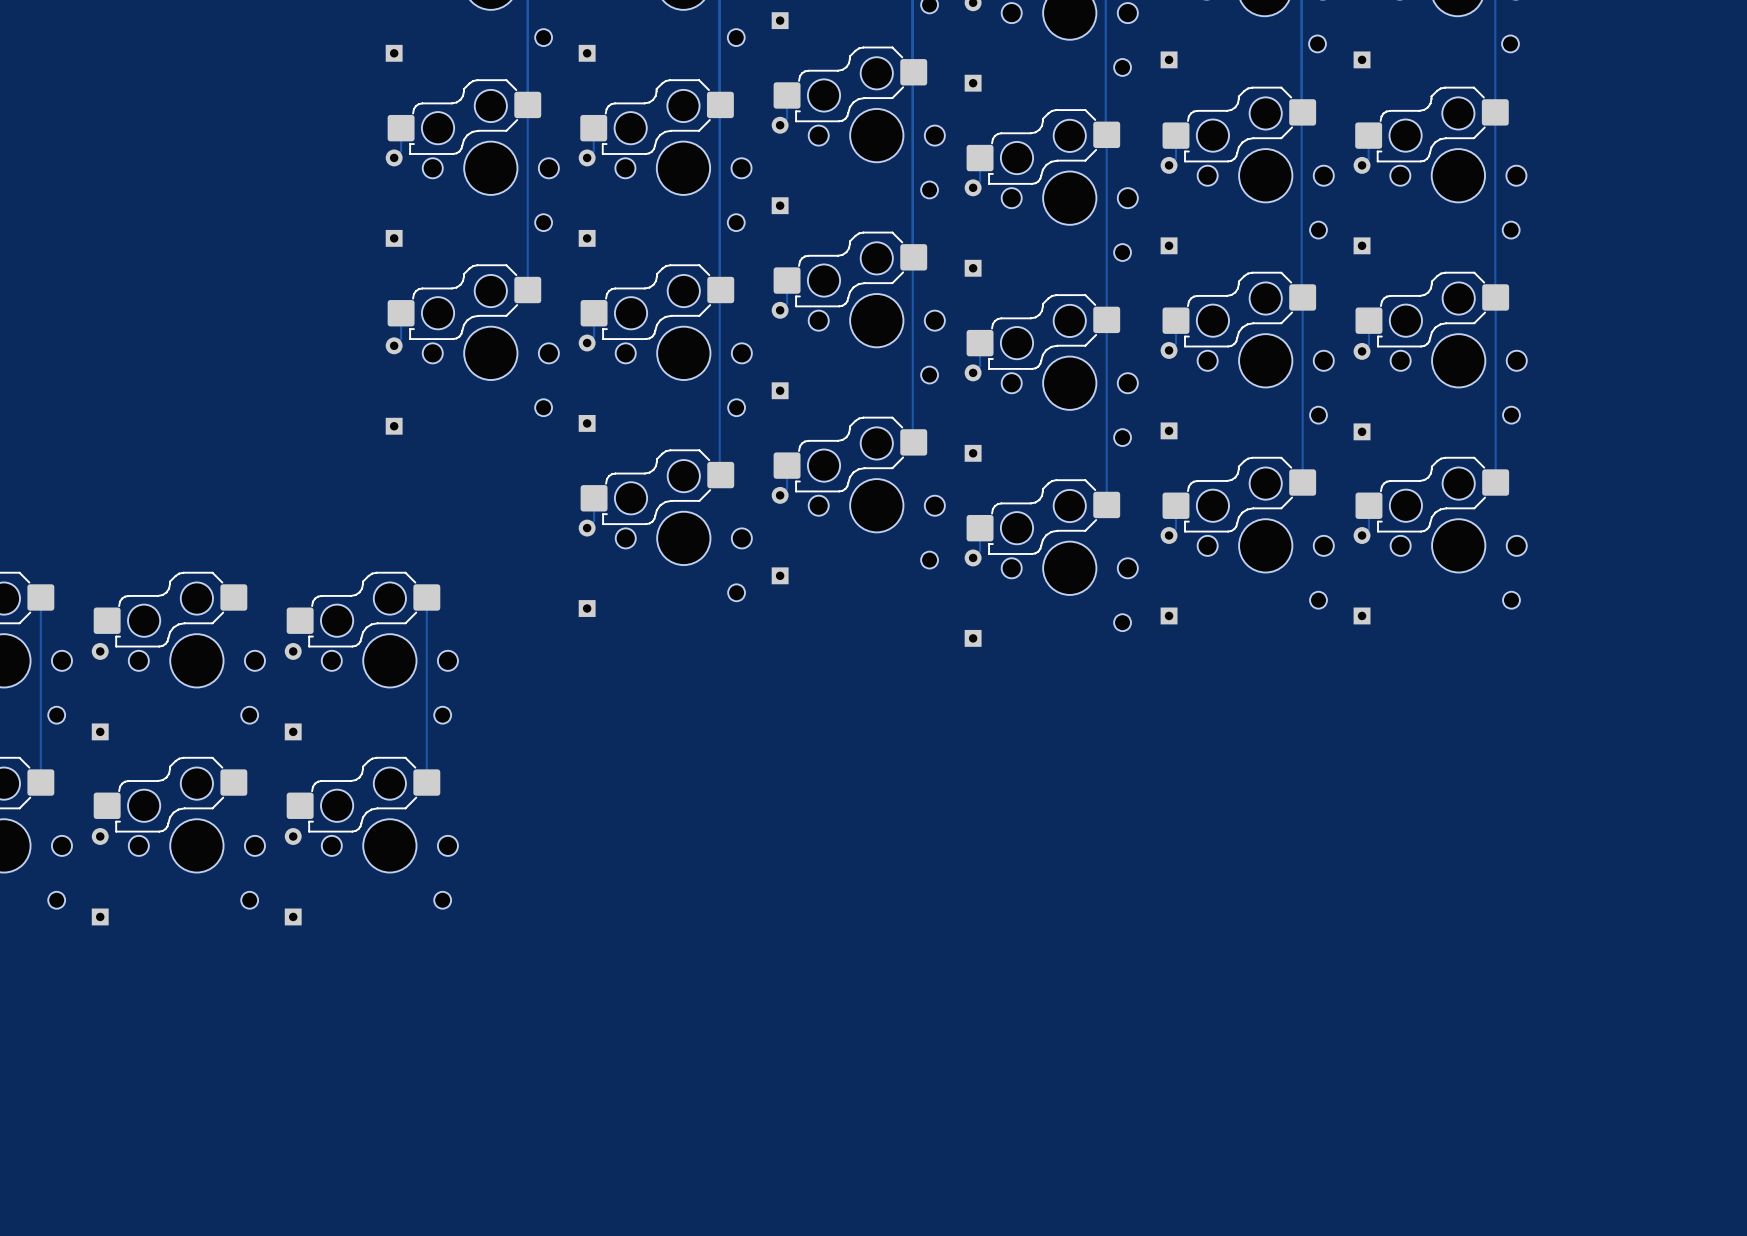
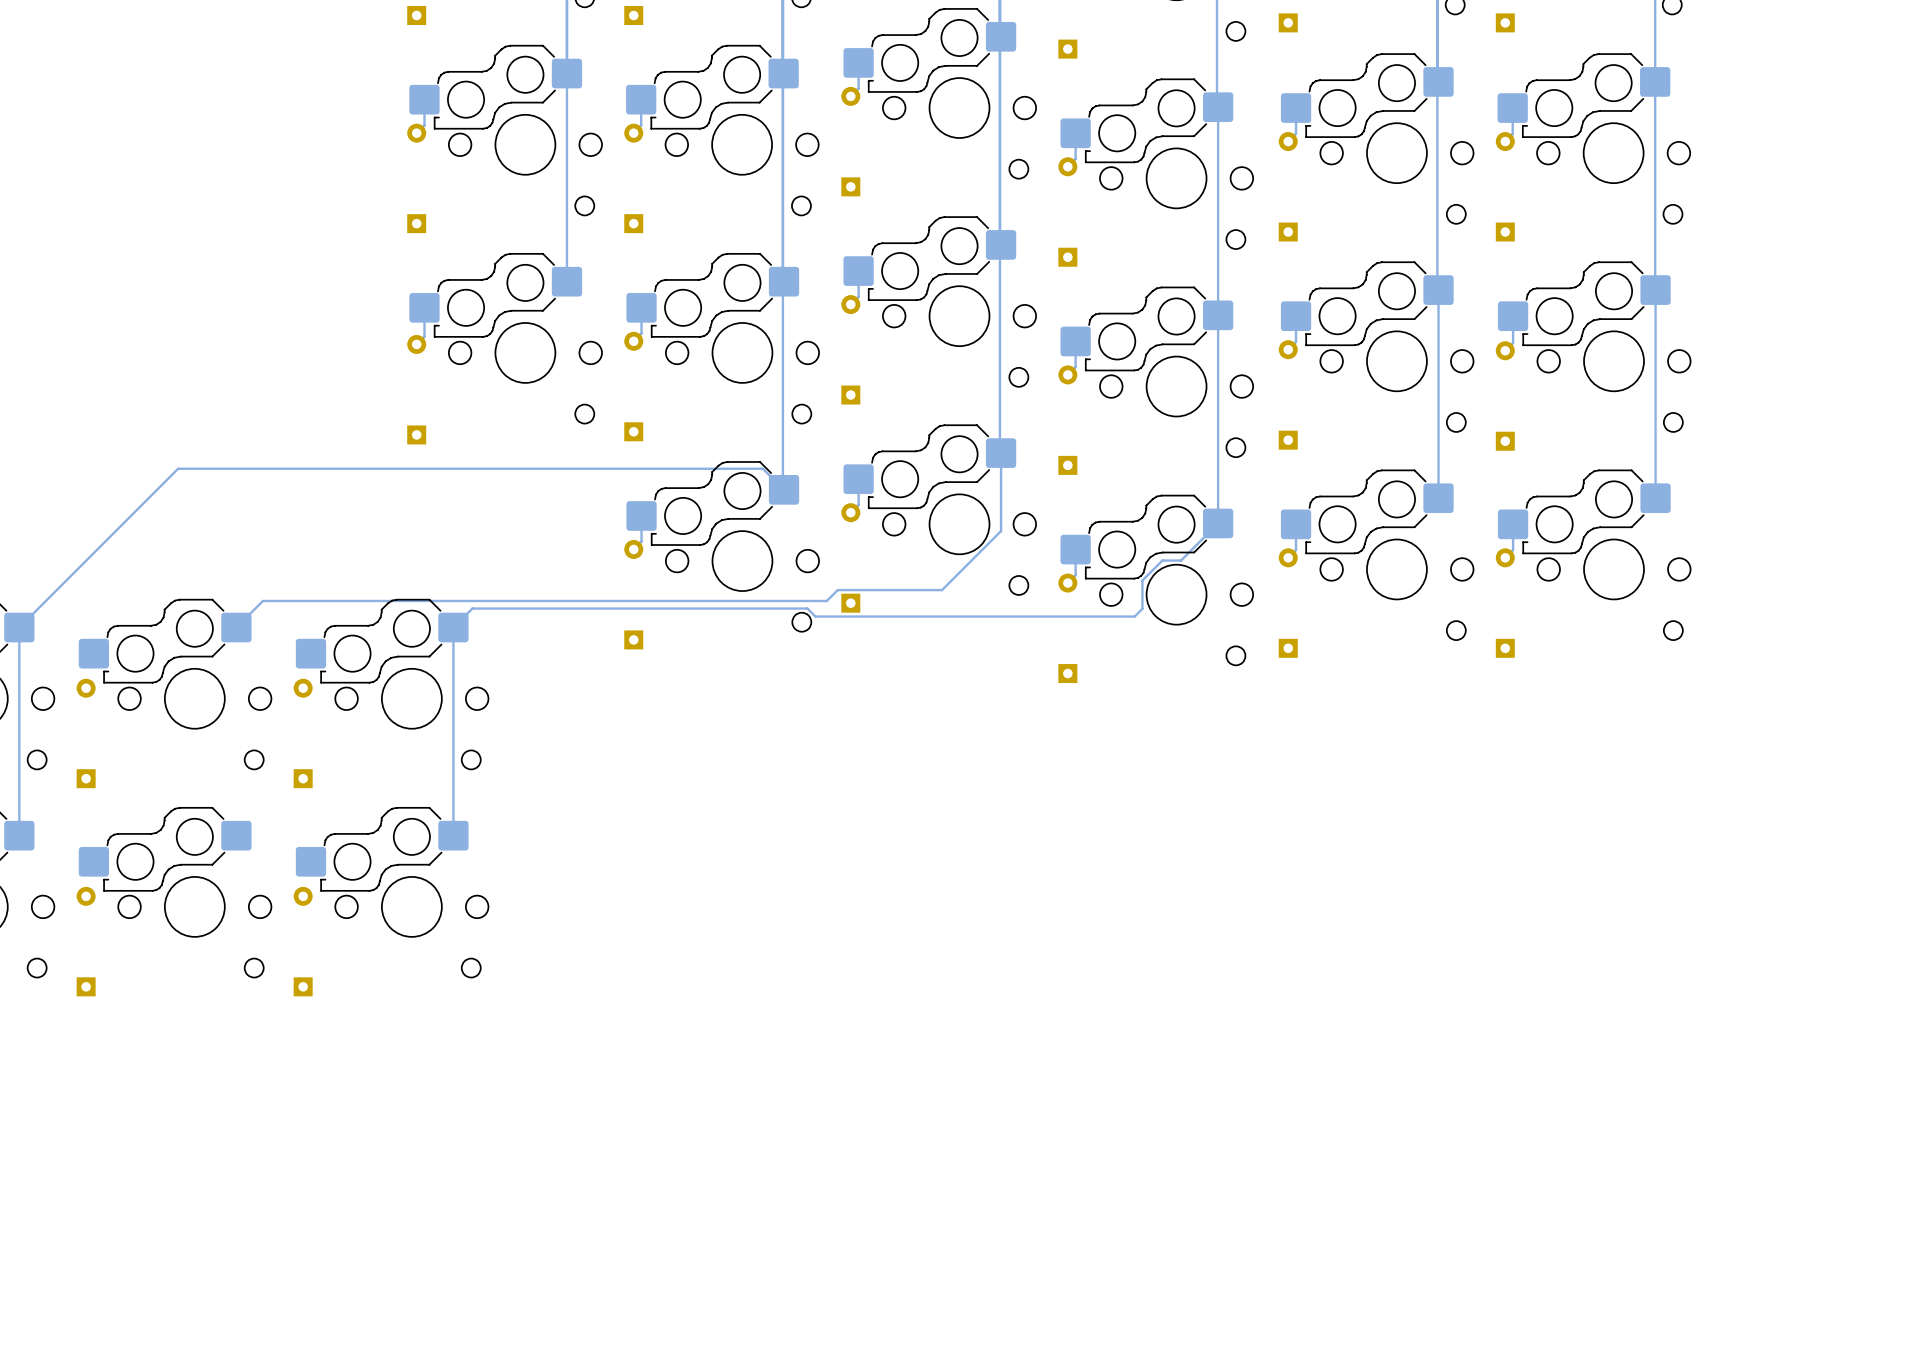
track: none -> (1001, 453) (1001, 531) (942, 590) (837, 590) (826, 600) (262, 600) (236, 627)
track: none -> (782, 488) (762, 468) (178, 468) (19, 627)
track: none -> (1218, 523) (1181, 560) (1162, 560) (1142, 580) (1142, 608) (1134, 616) (815, 616) (807, 608) (472, 608) (453, 627)

